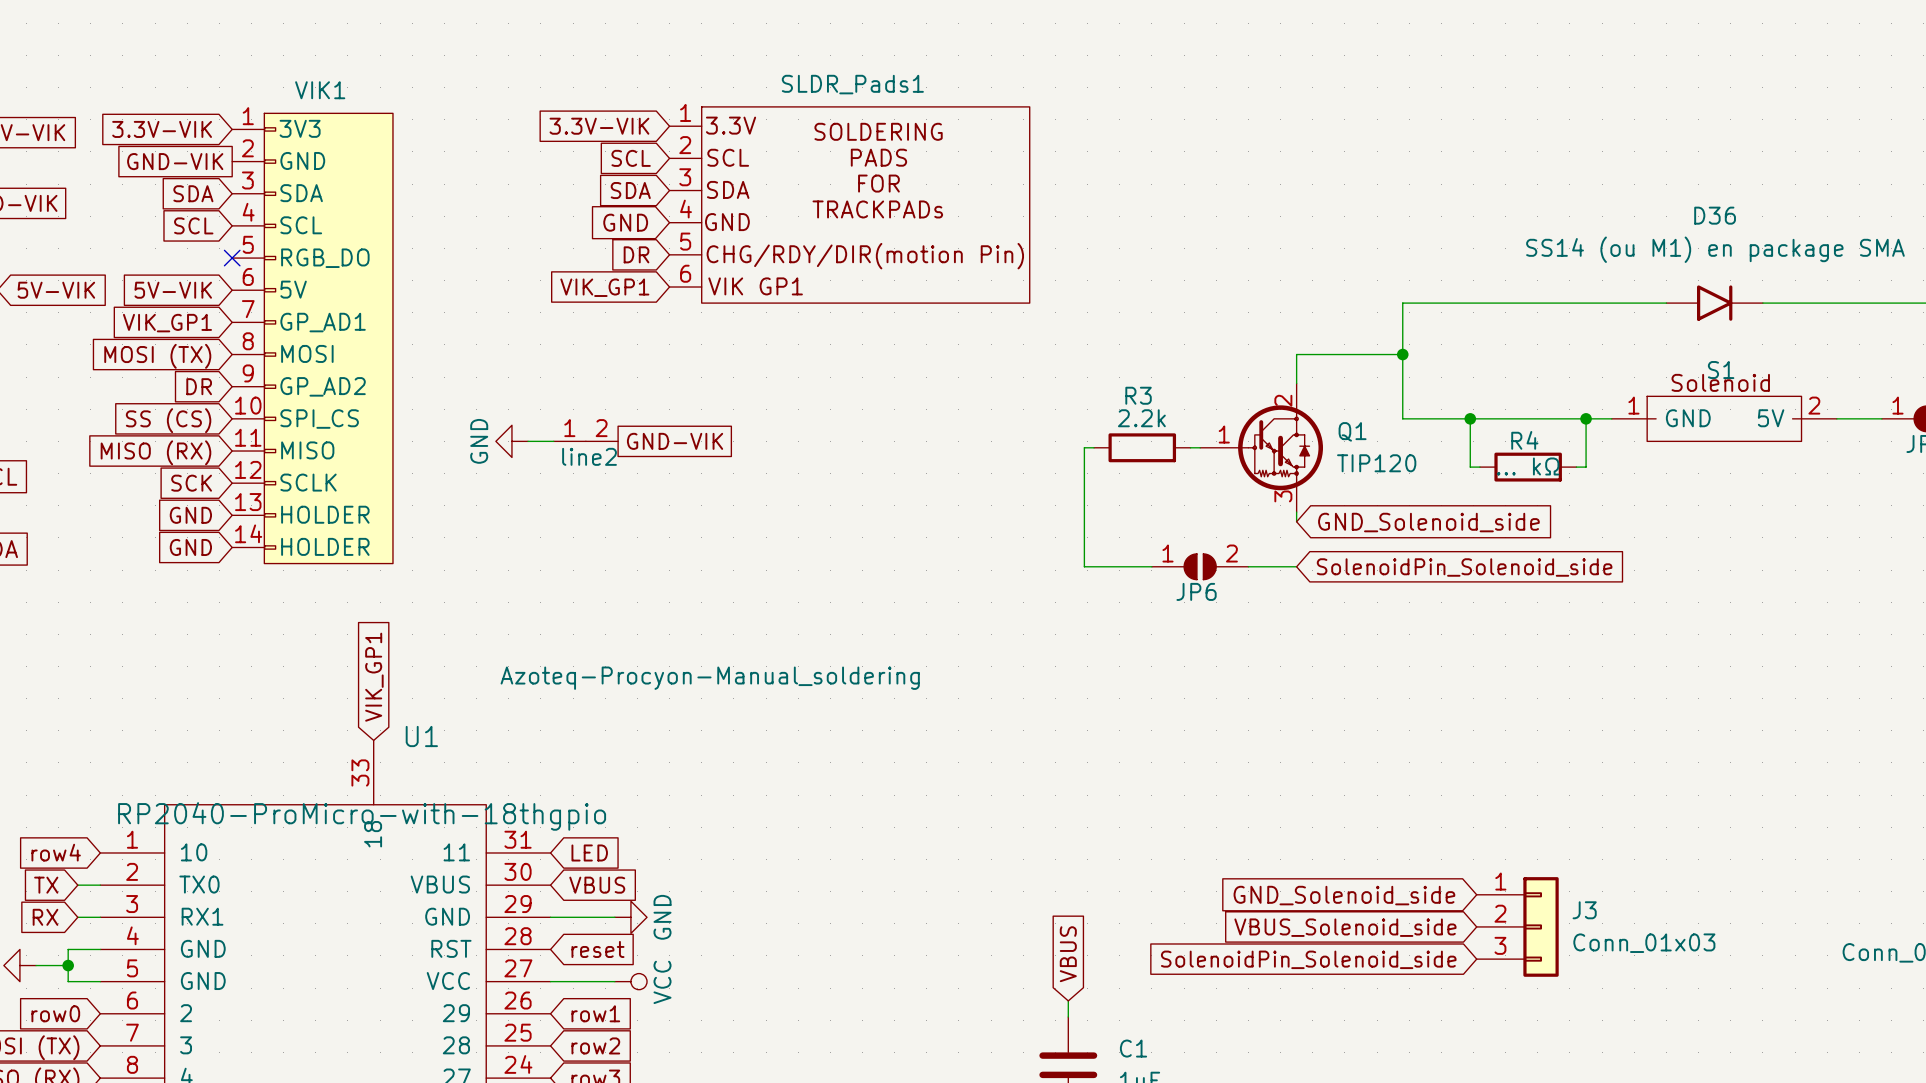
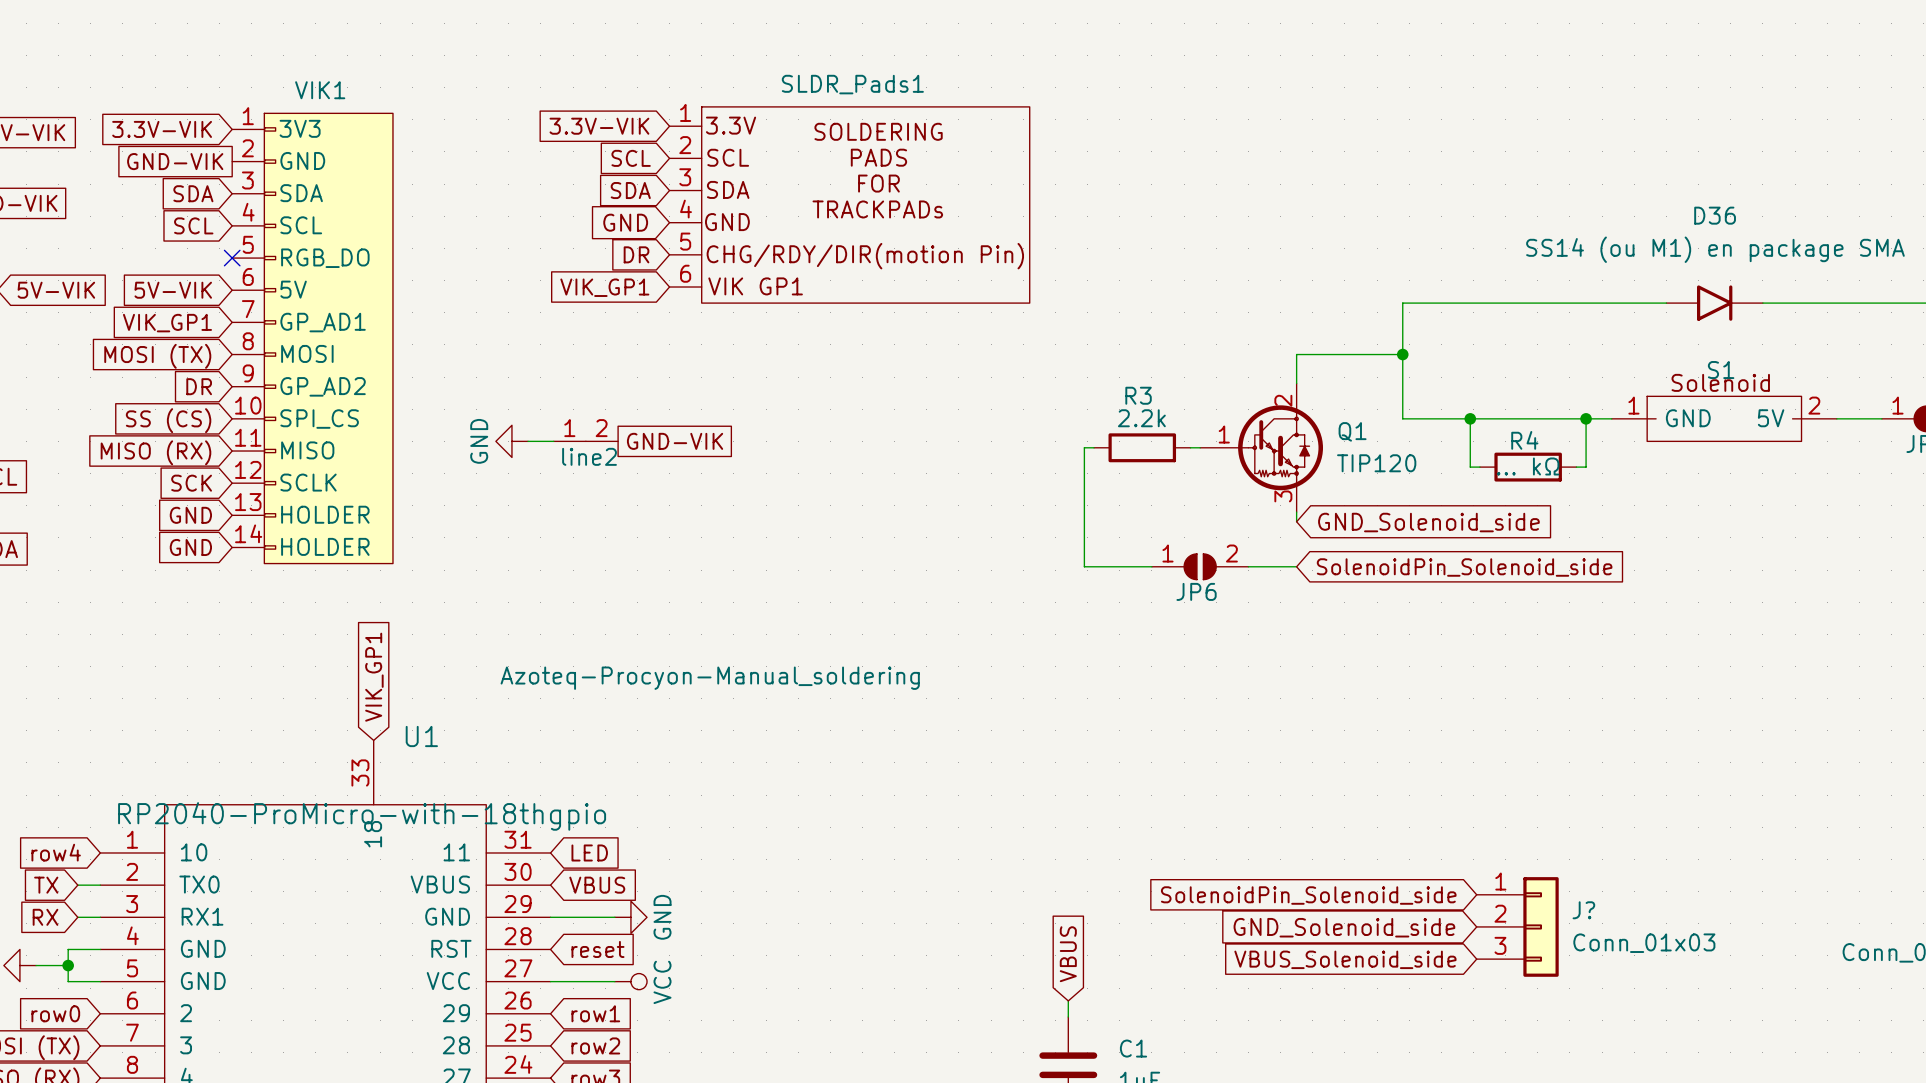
global label: GND_Solenoid_side (1344, 895) -> SolenoidPin_Solenoid_side (1308, 895)
J3 name: J3 (1584, 910) -> J? (1583, 910)
global label: VBUS_Solenoid_side (1345, 927) -> GND_Solenoid_side (1344, 927)
global label: SolenoidPin_Solenoid_side (1308, 959) -> VBUS_Solenoid_side (1345, 959)

